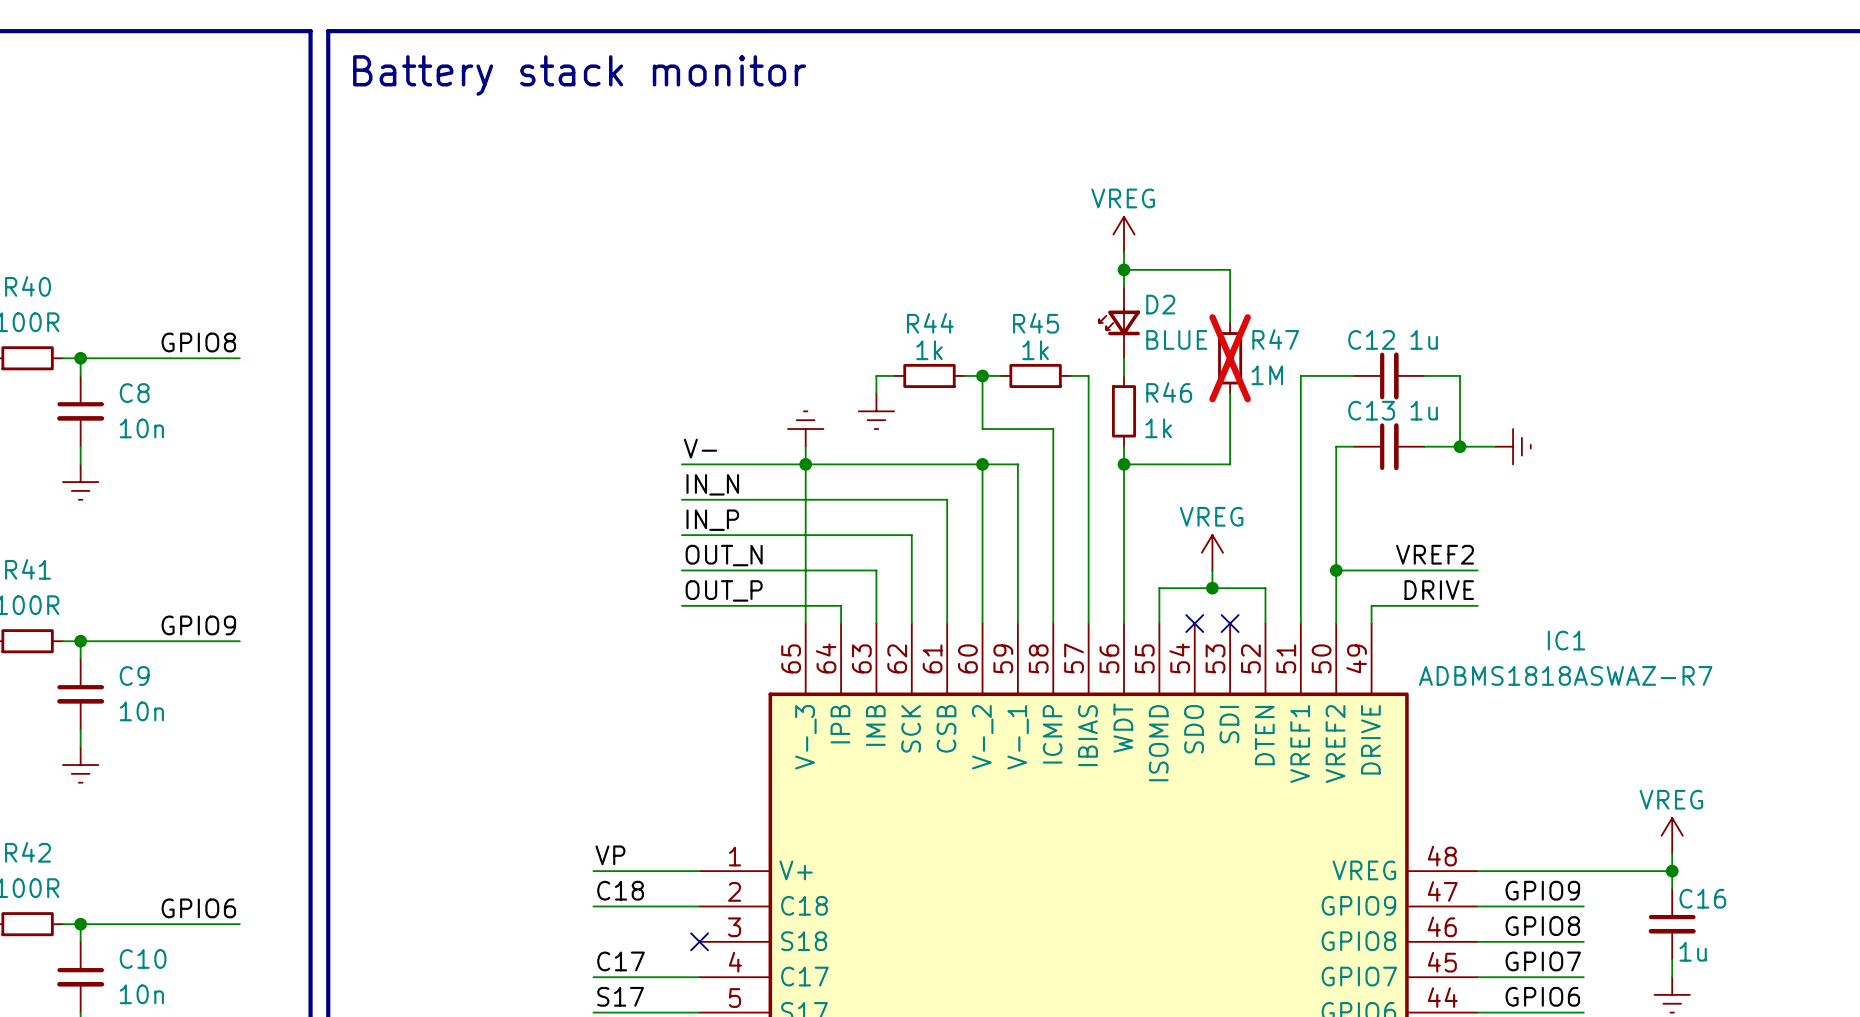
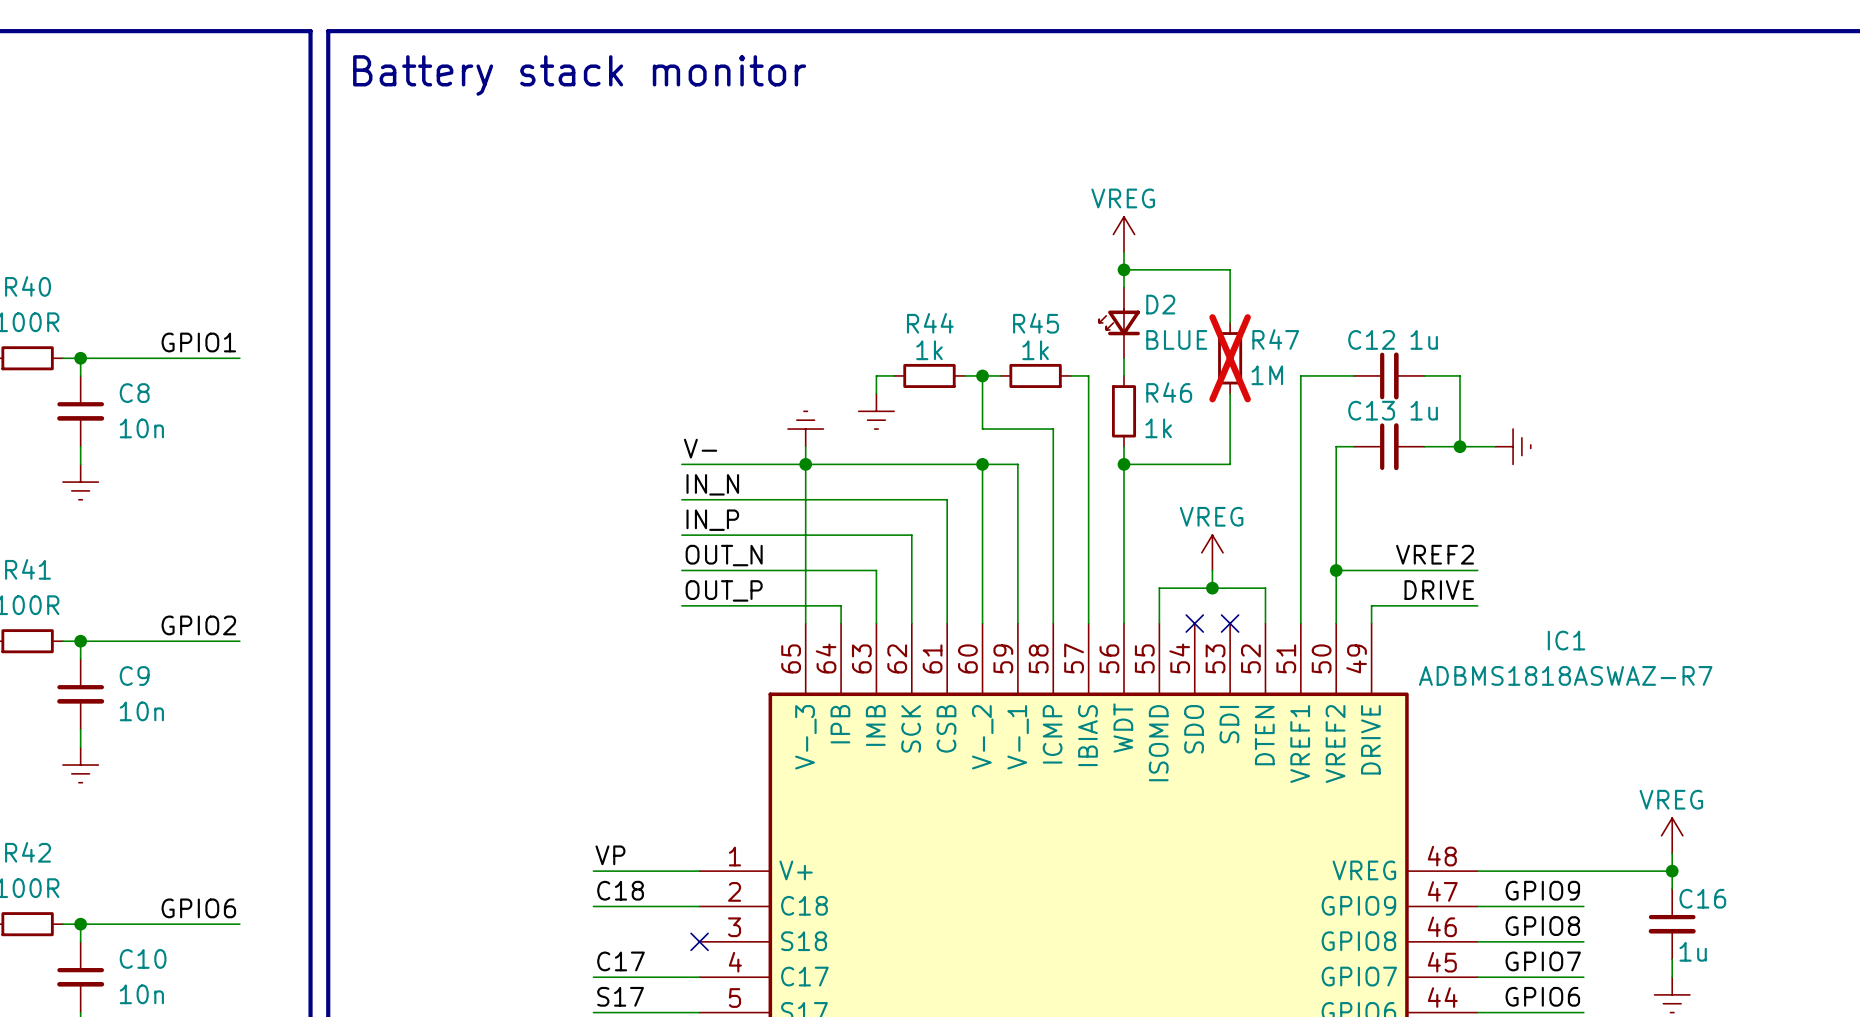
label: GPIO8 (198, 342) -> GPIO1 (198, 342)
label: GPIO9 (198, 625) -> GPIO2 (198, 625)

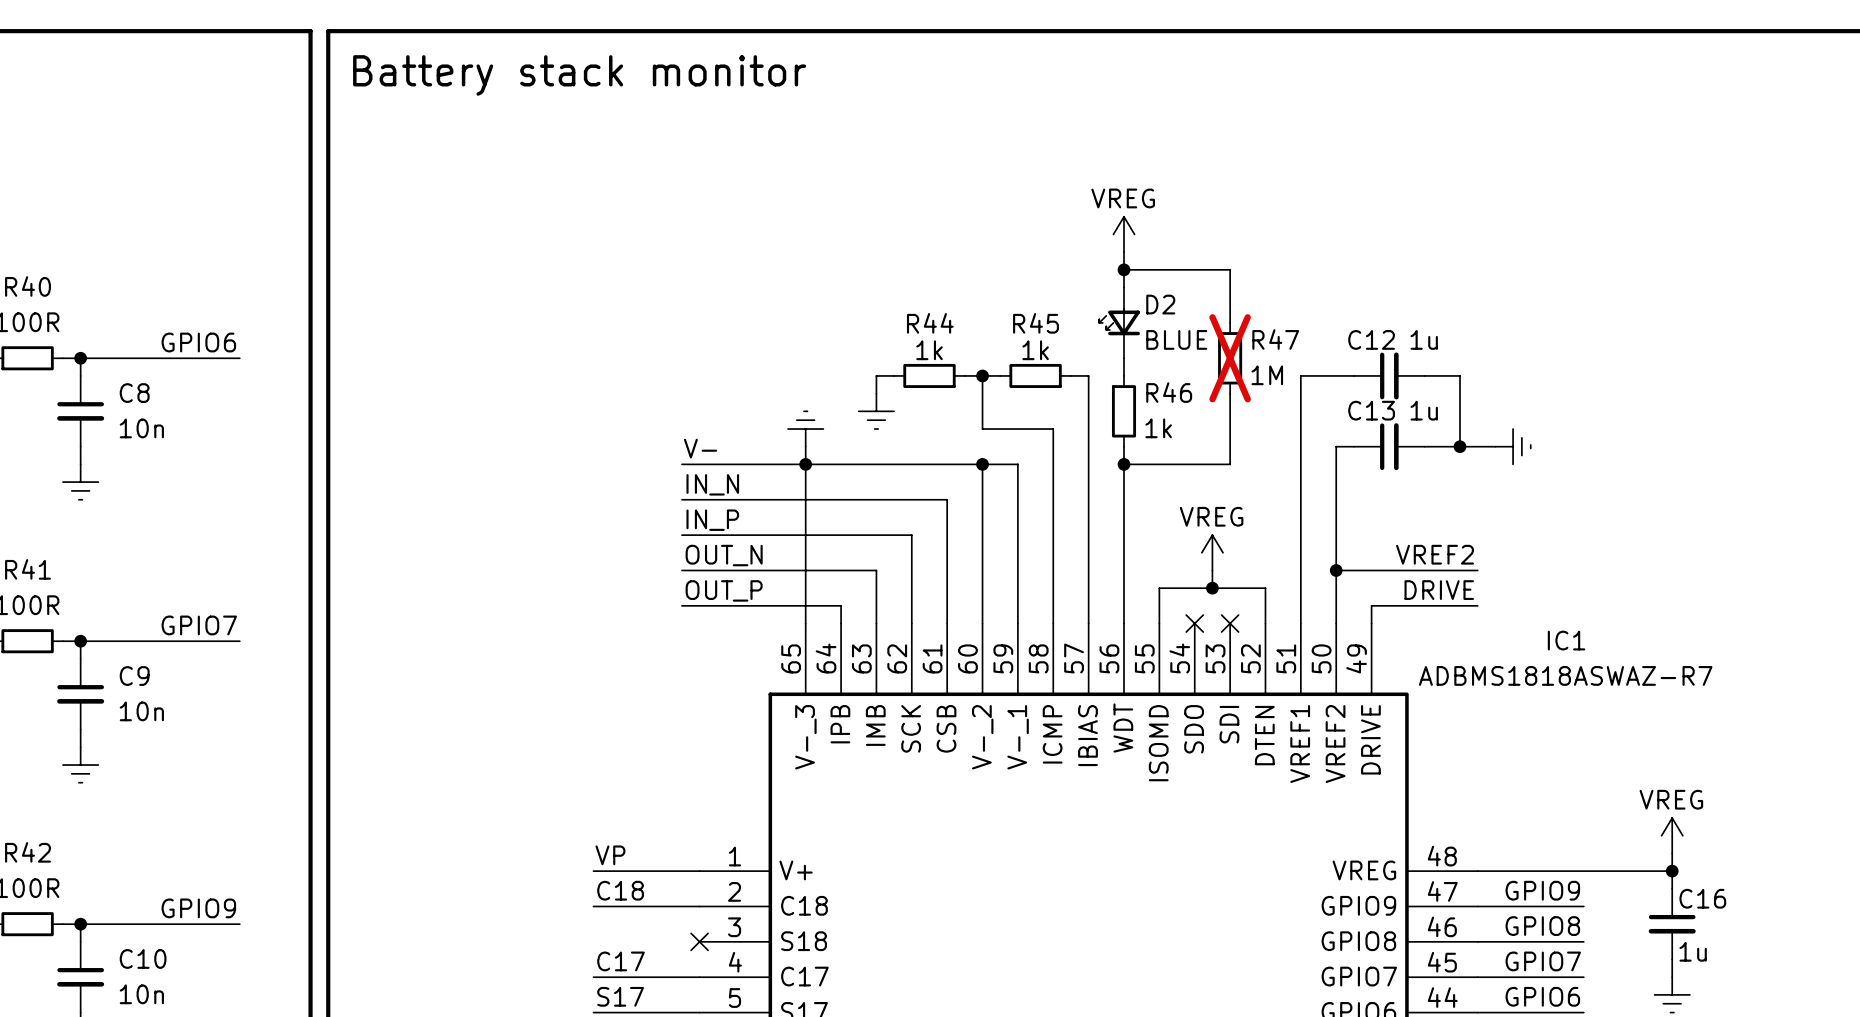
label: GPIO1 (198, 342) -> GPIO6 (198, 342)
label: GPIO2 (198, 625) -> GPIO7 (199, 625)
label: GPIO6 (198, 908) -> GPIO9 (198, 908)

